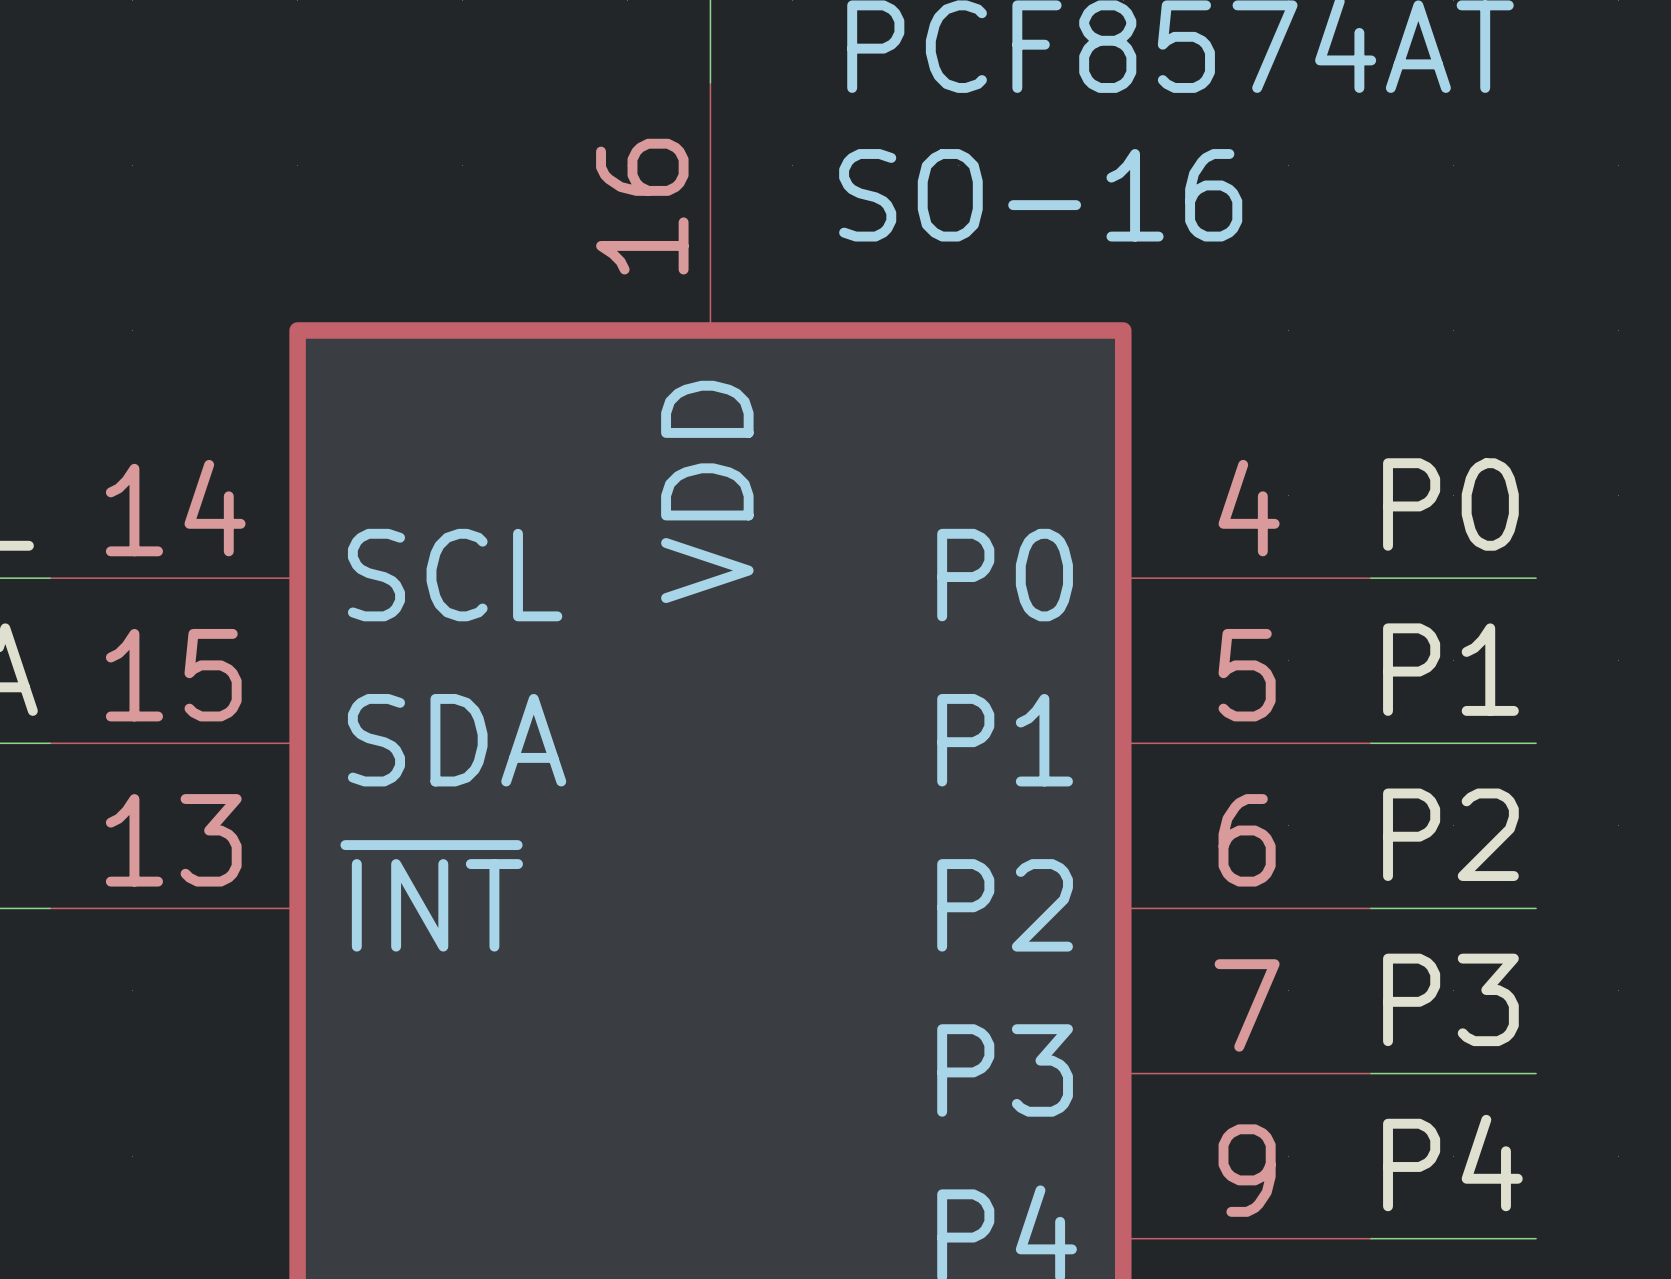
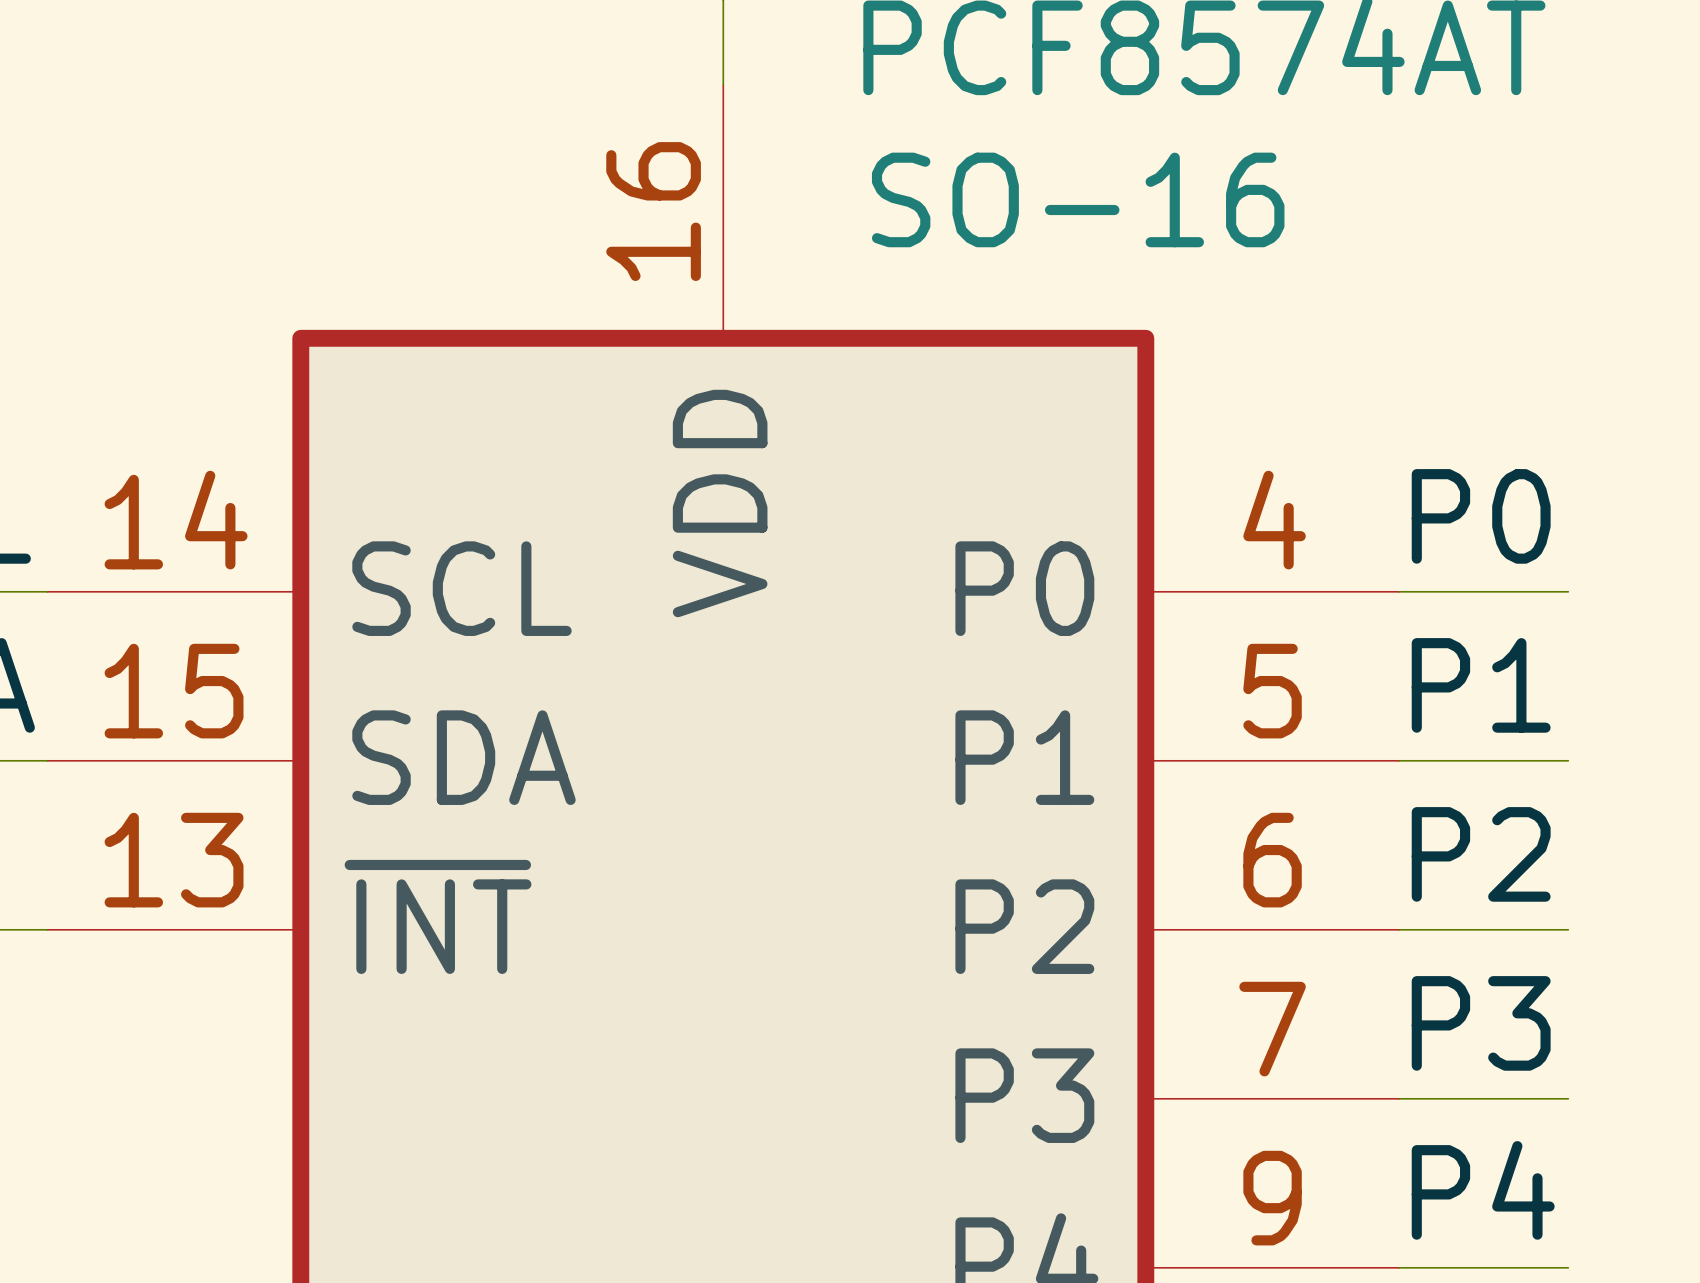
part text position: SO-16 (1040, 195) -> SO-16 (1078, 199)

